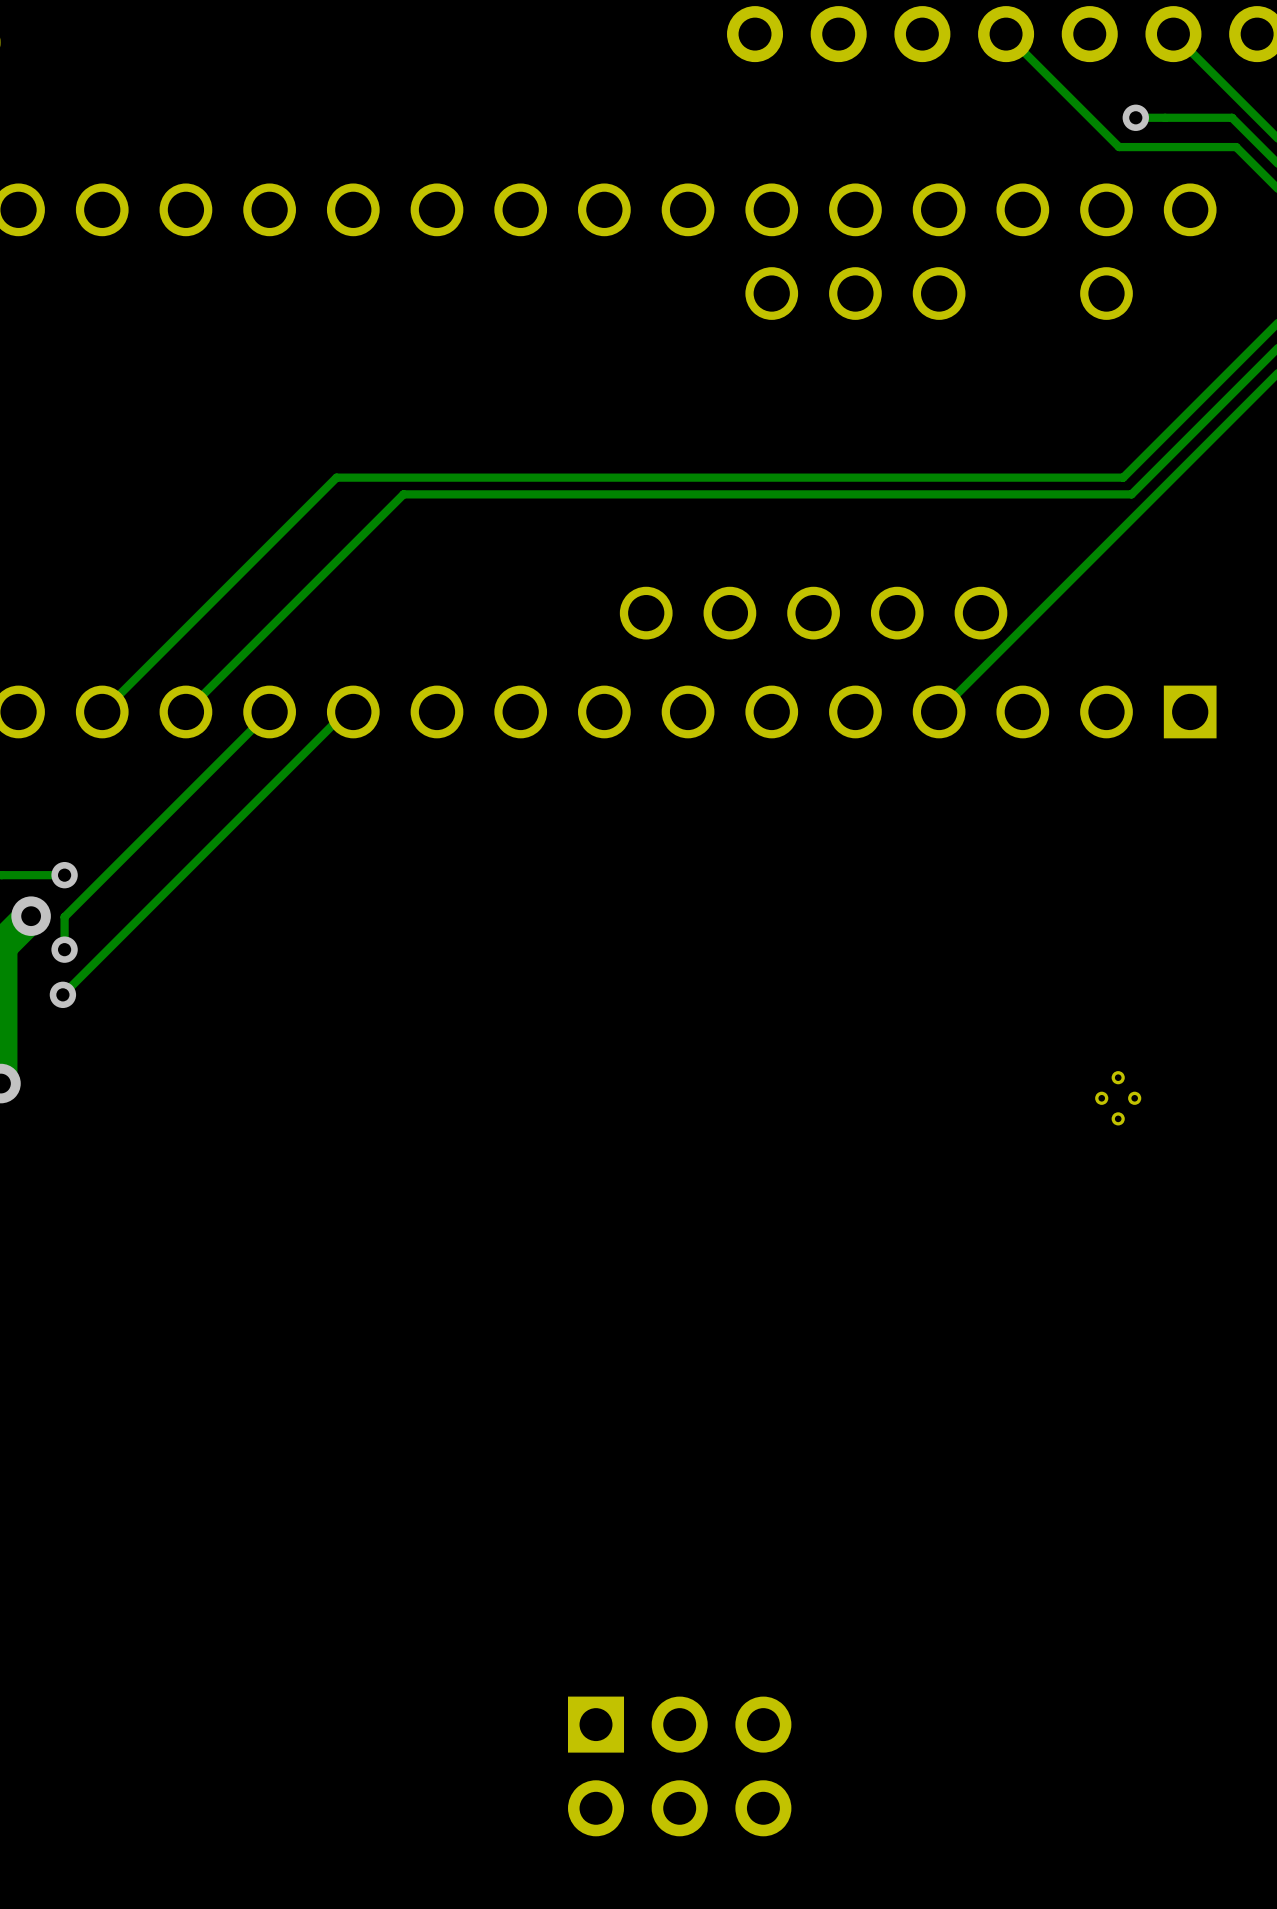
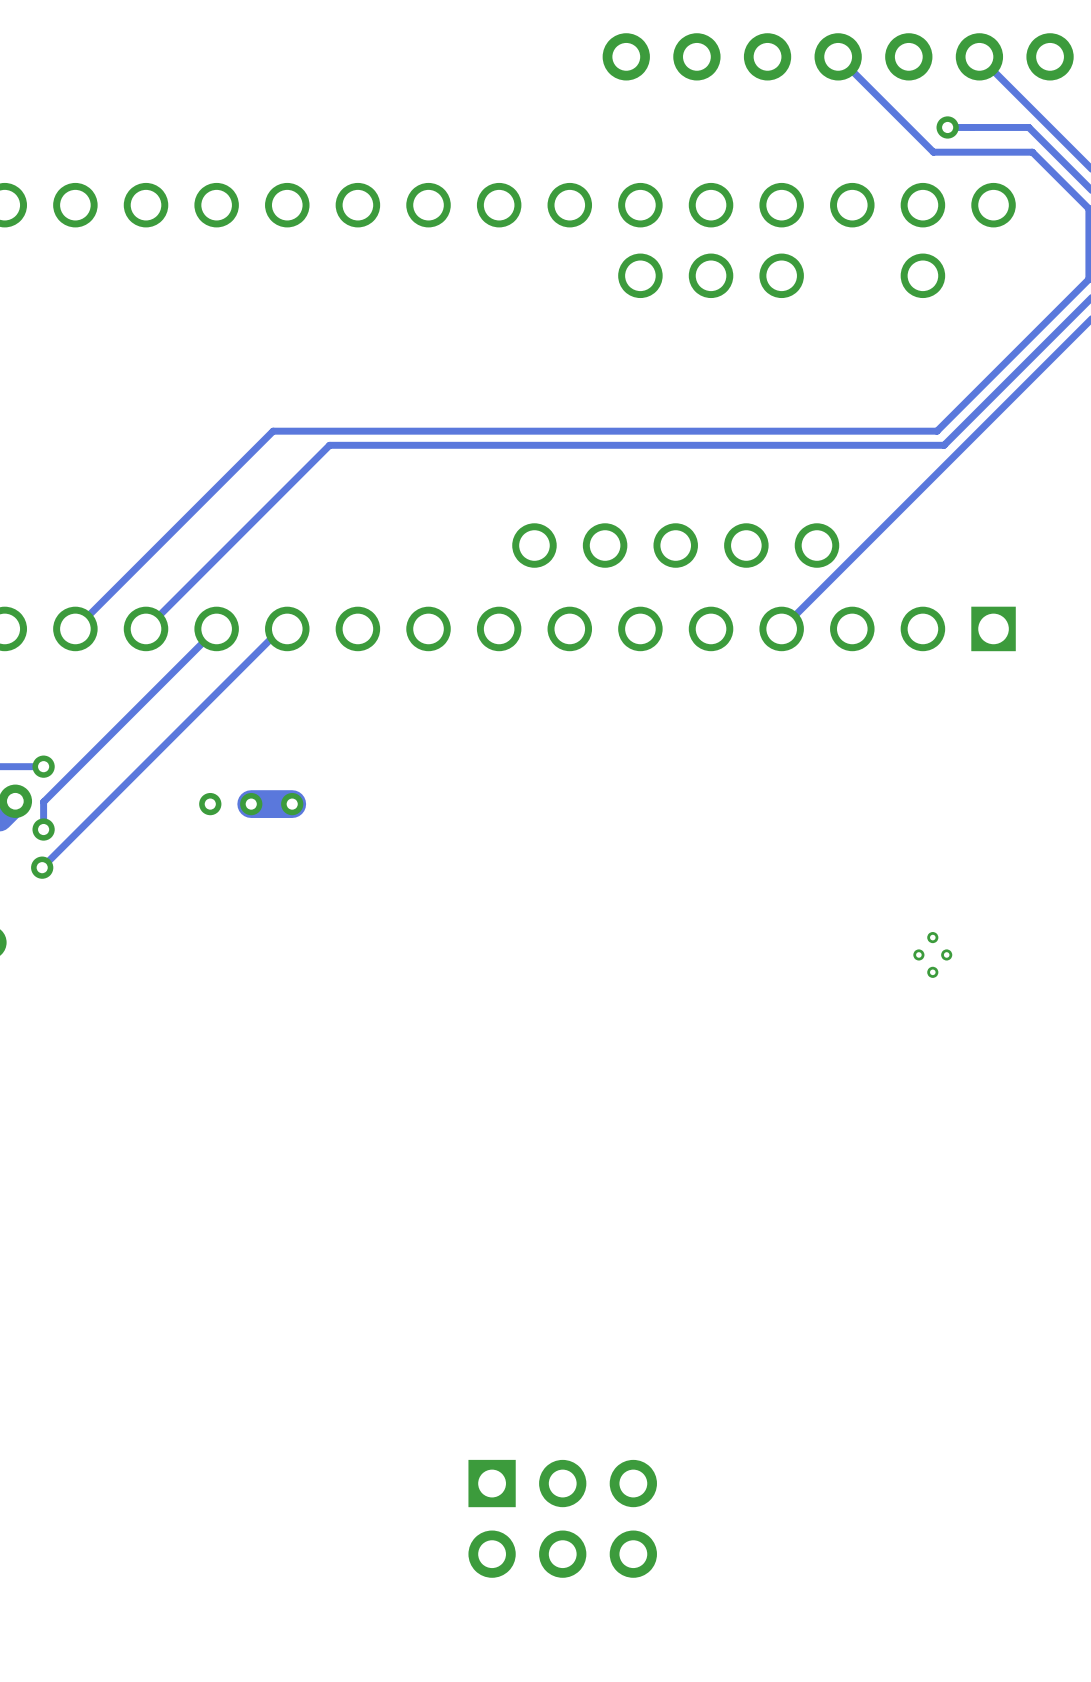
via: none -> (210, 804)
via: none -> (251, 804)
track: none -> (292, 804) (251, 804)
via: none -> (292, 804)

